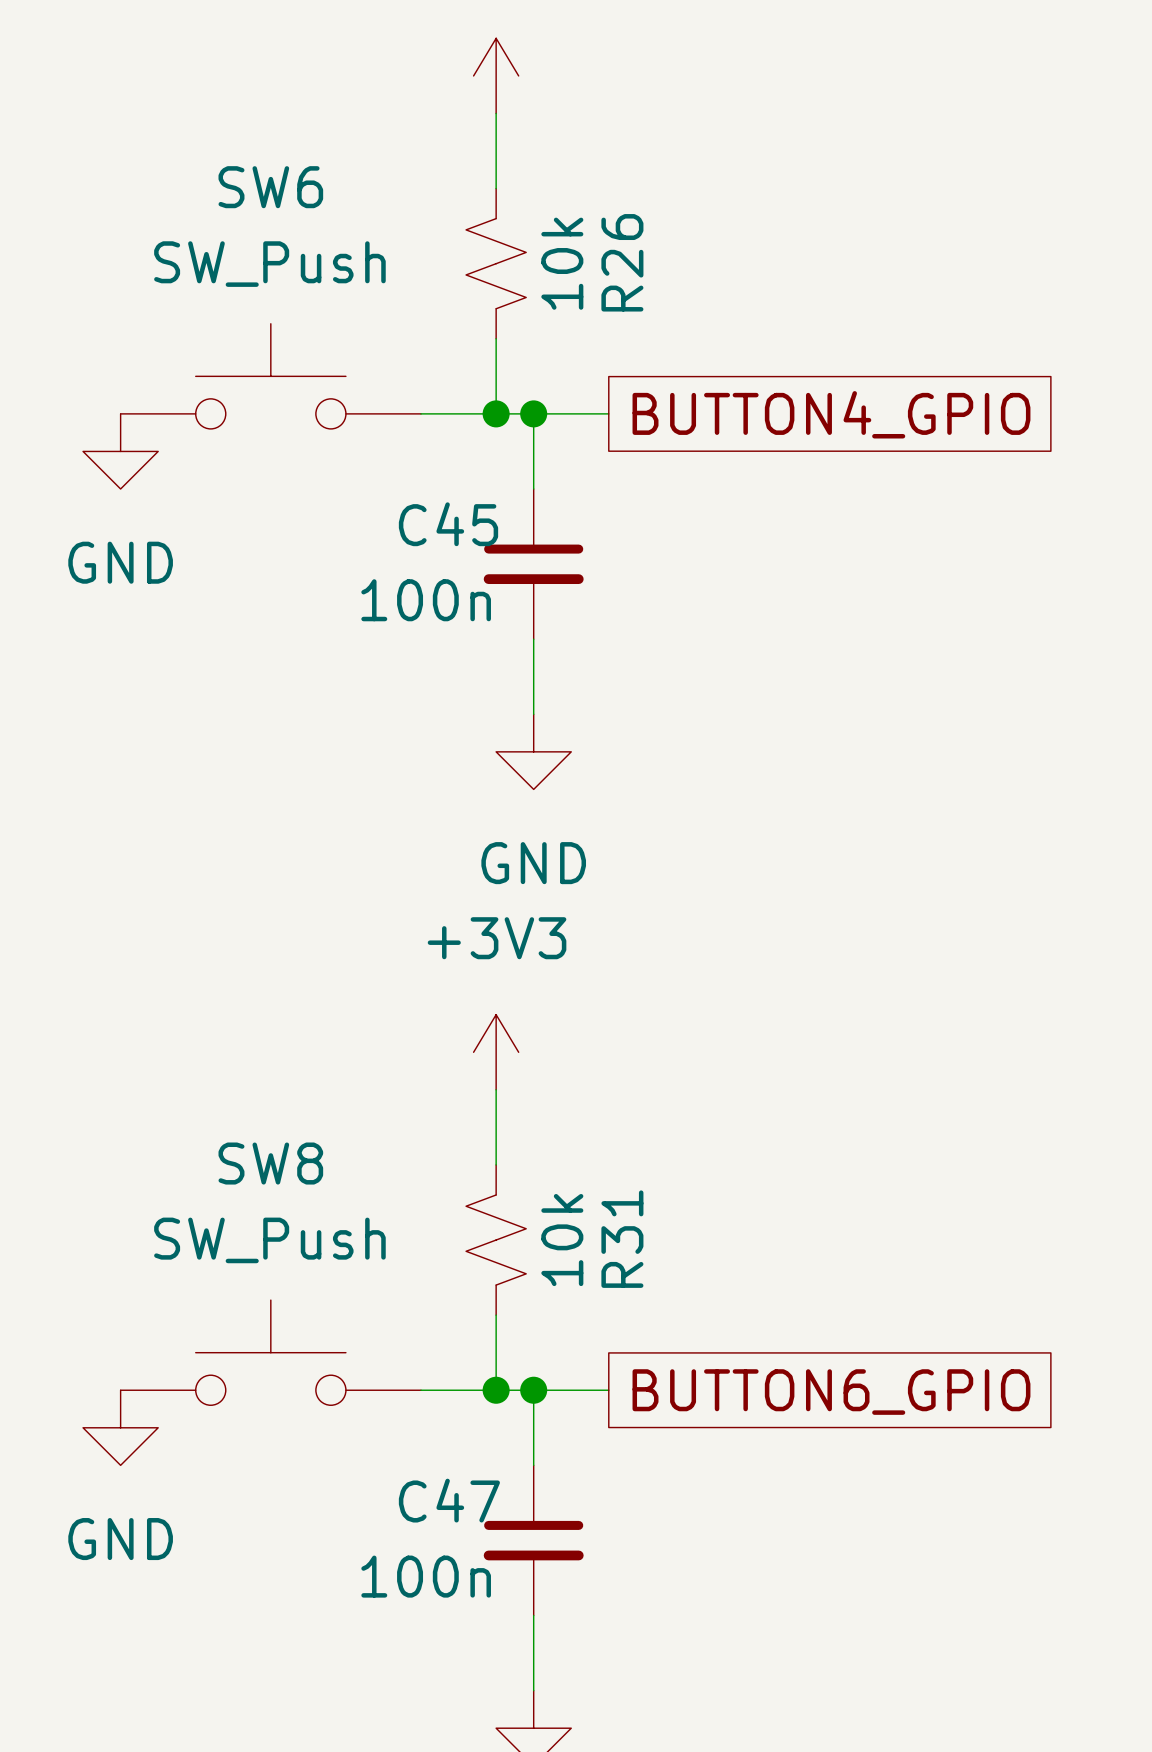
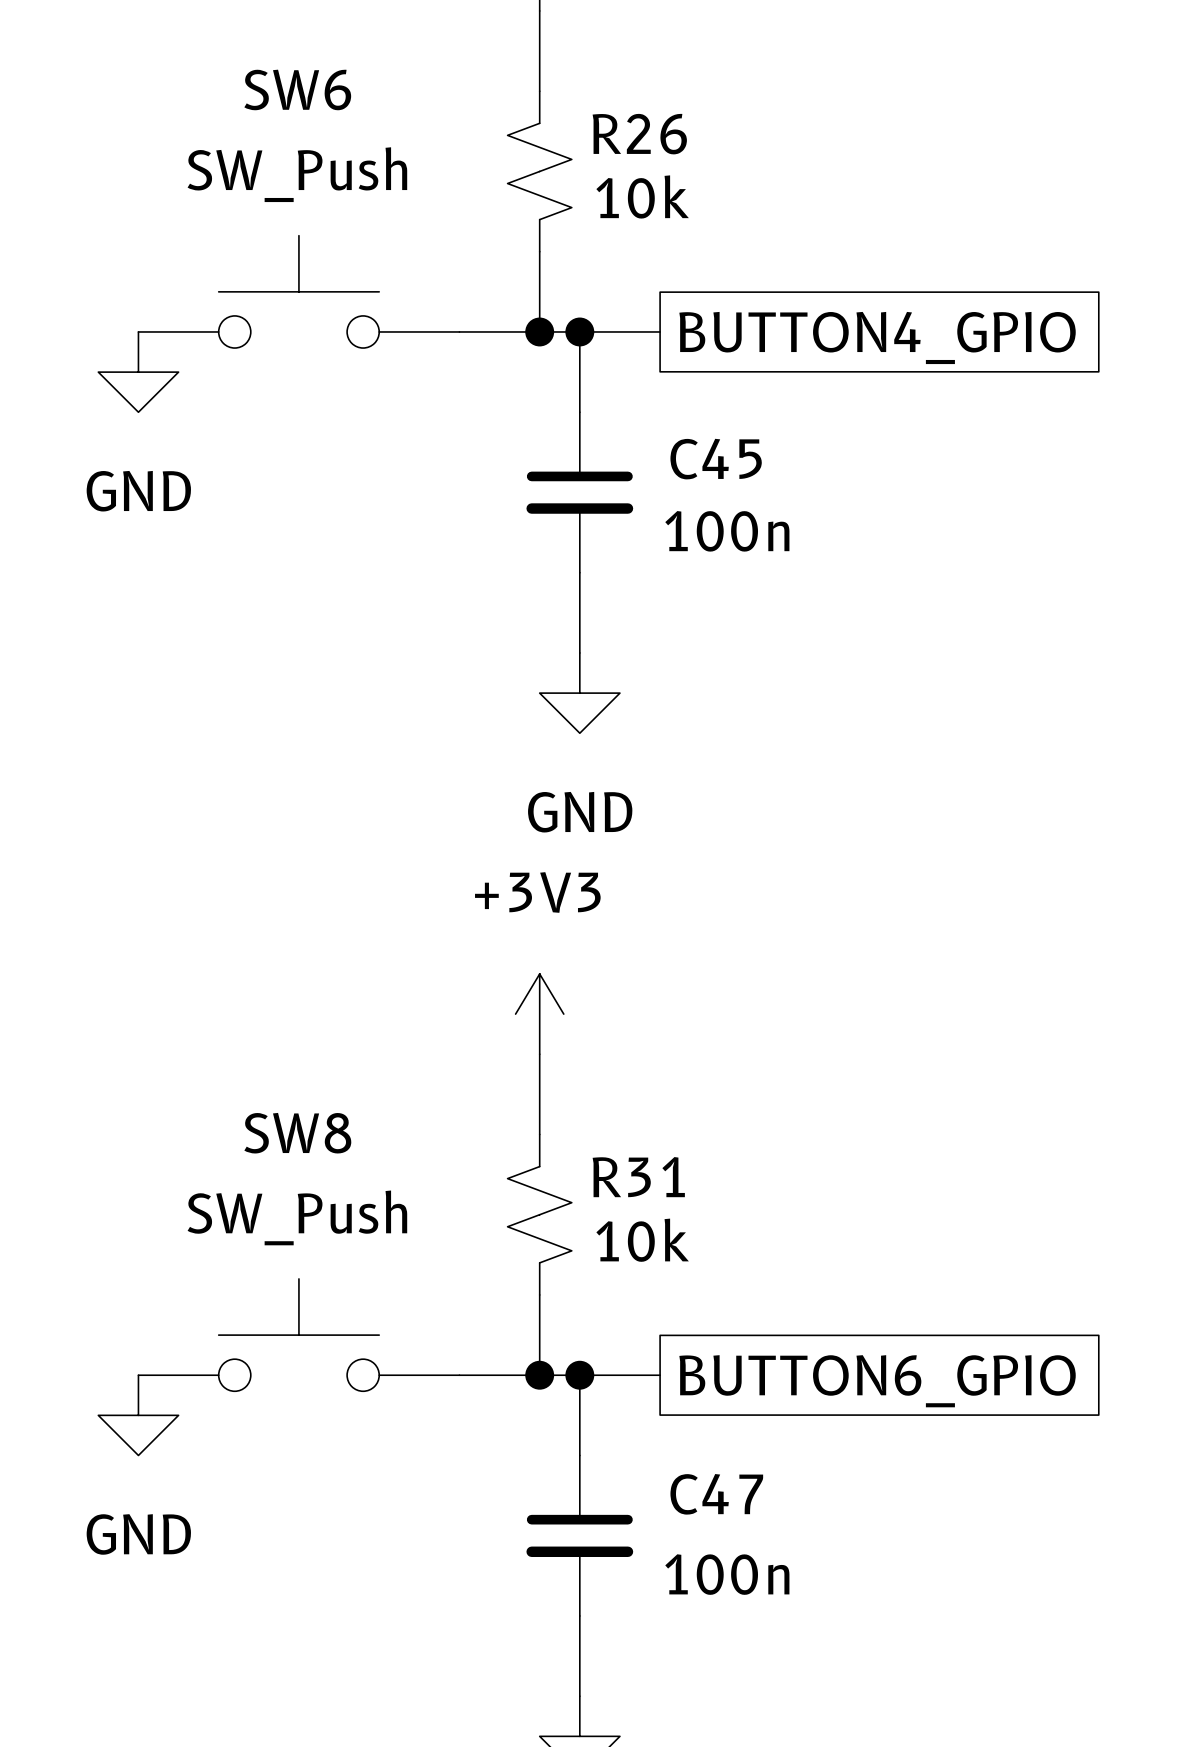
R26 name rotation: 0° (622, 262) -> 90° clockwise (639, 134)
R26 value rotation: 0° (562, 263) -> 90° clockwise (642, 196)
C45 name position: C45 (448, 524) -> C45 (716, 459)
C45 value position: 100n (426, 600) -> 100n (727, 531)
R31 name rotation: 0° (622, 1239) -> 90° clockwise (638, 1177)
R31 value rotation: 0° (562, 1240) -> 90° clockwise (642, 1240)
C47 name position: C47 (449, 1500) -> C47 (716, 1494)
C47 value position: 100n (426, 1576) -> 100n (727, 1574)

